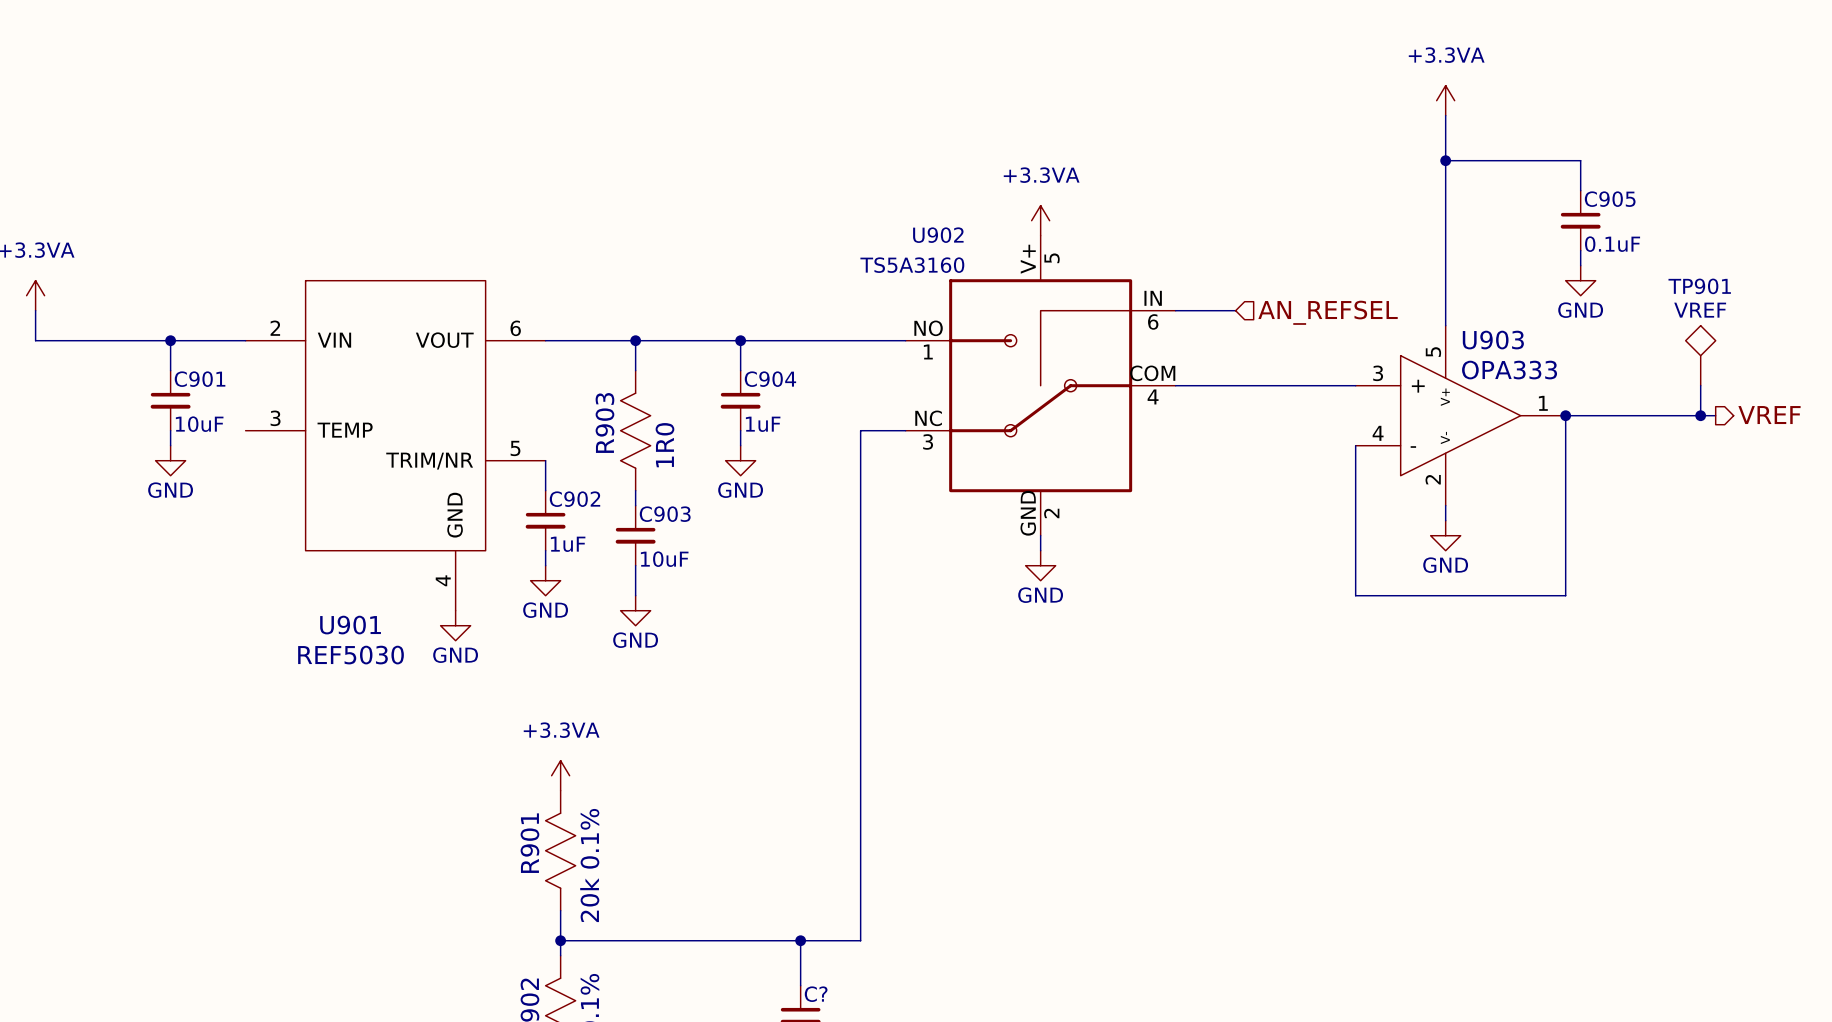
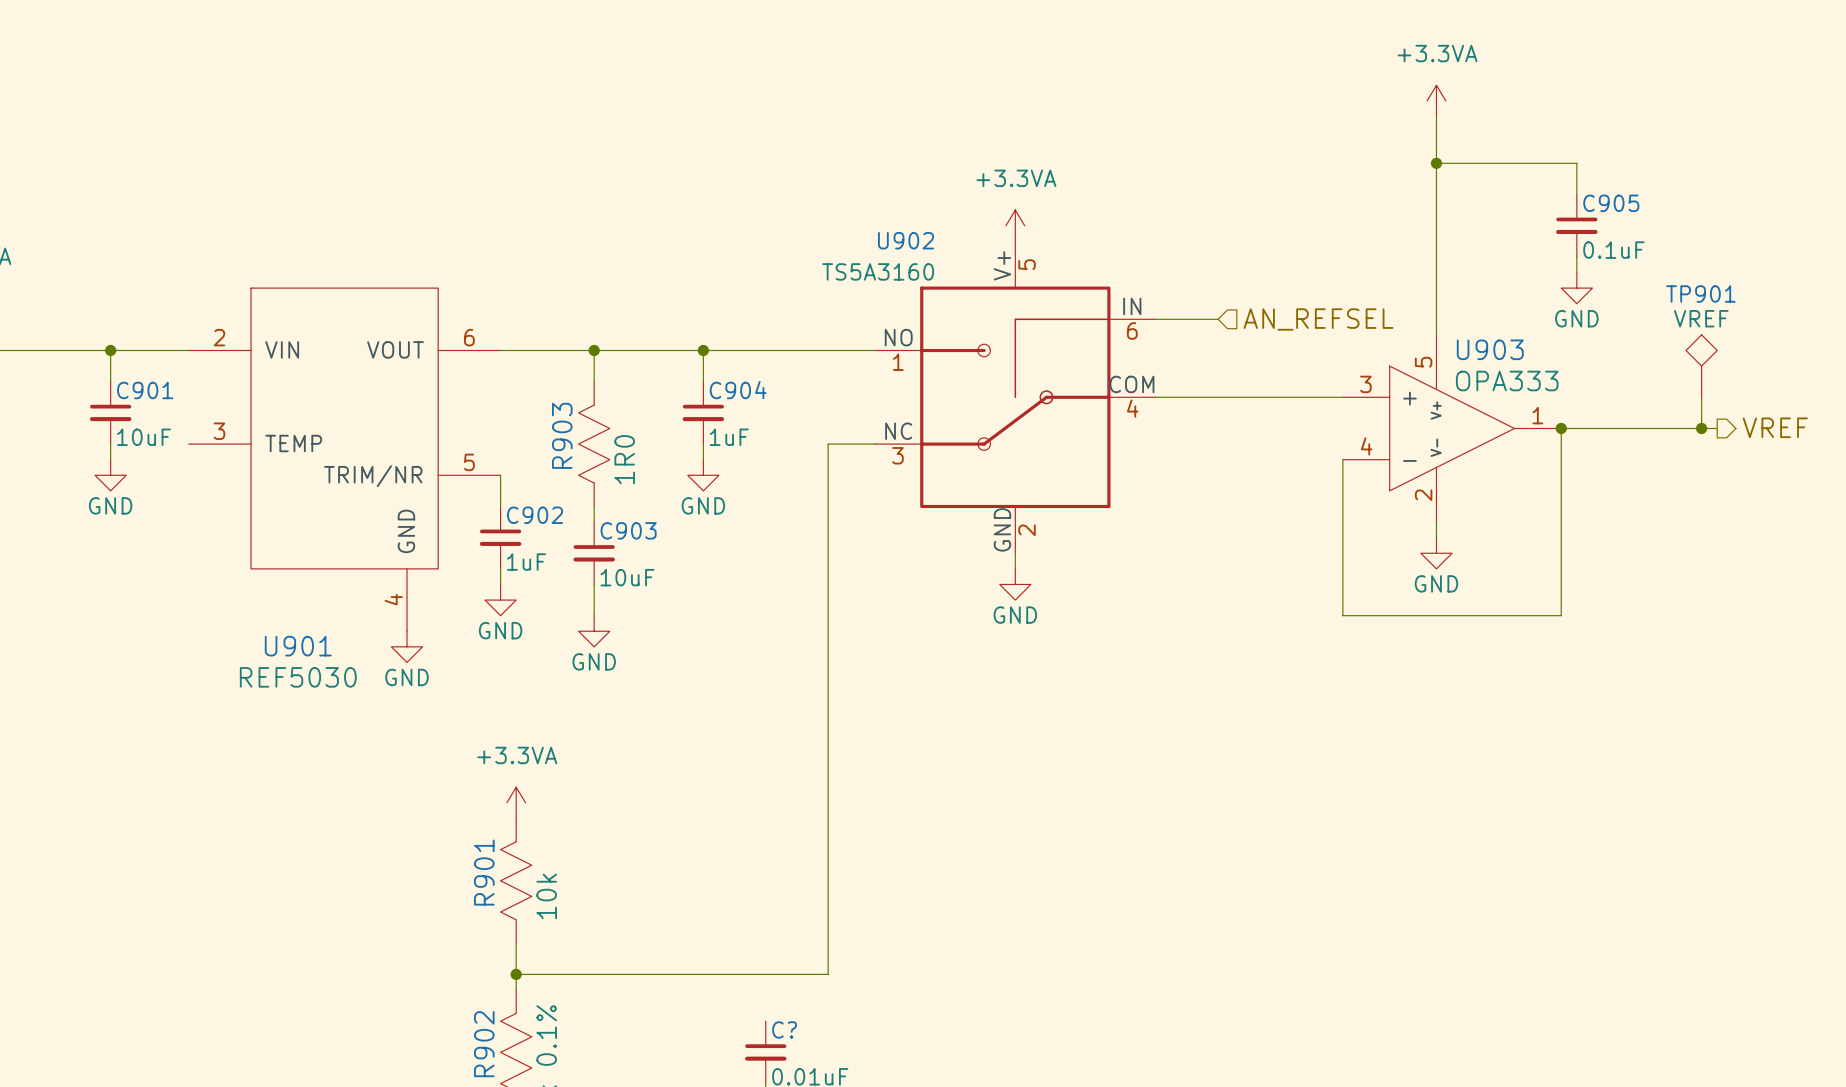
R901 value: 20k 0.1% (589, 865) -> 10k (546, 896)
wire: (800, 940) (800, 985) -> none
junction: (800, 940) -> none

